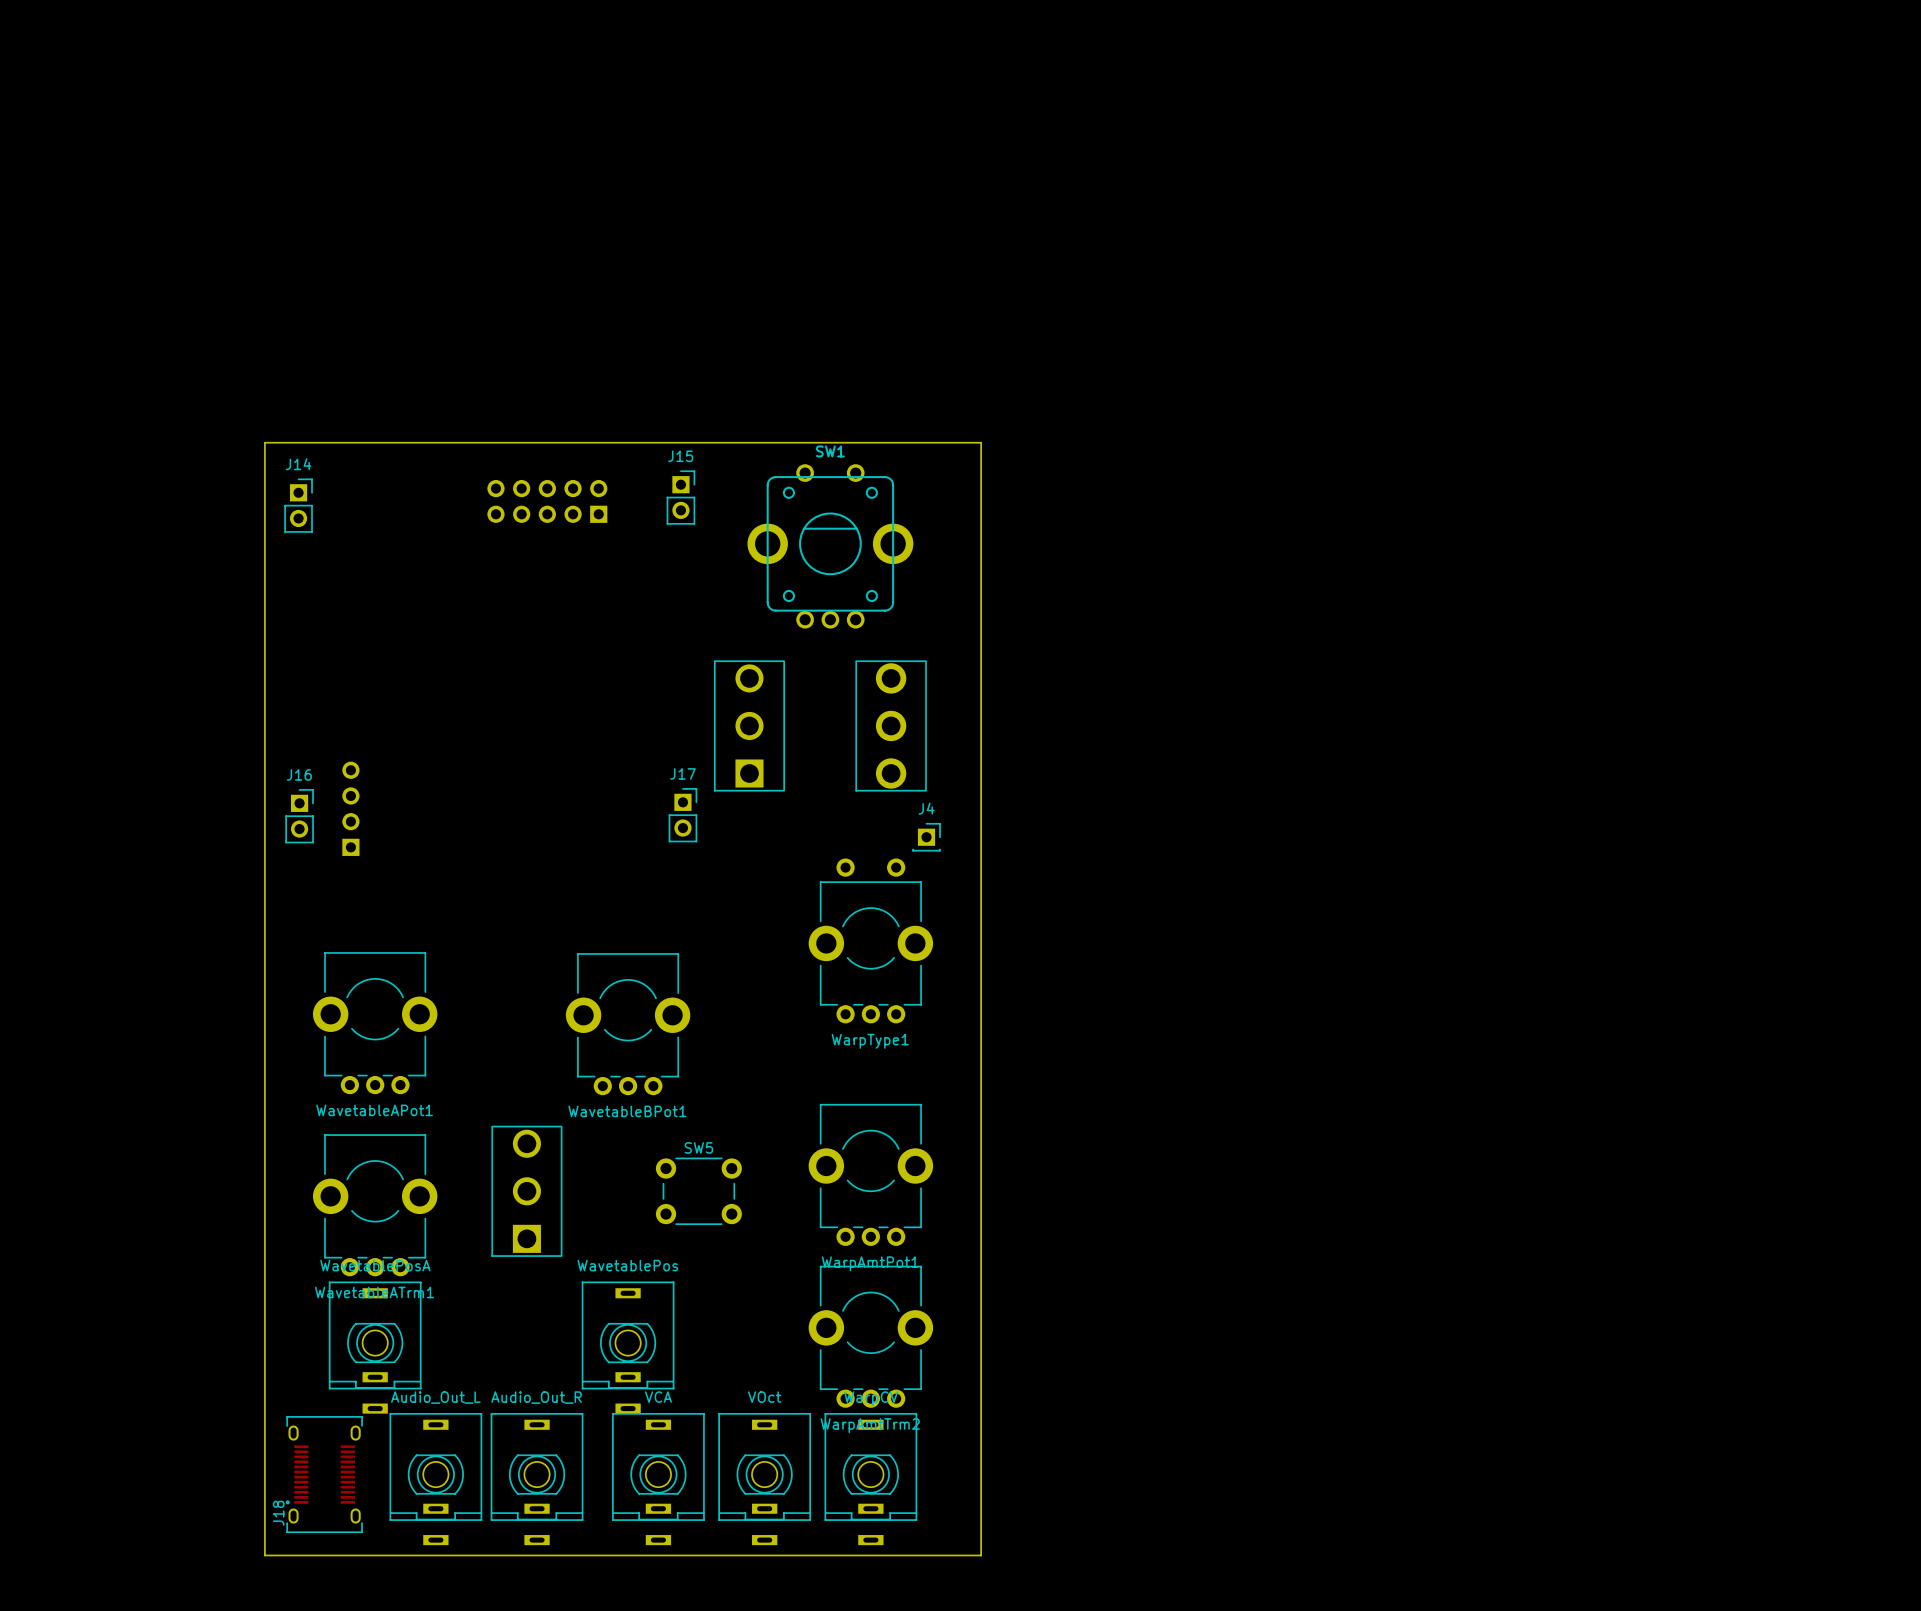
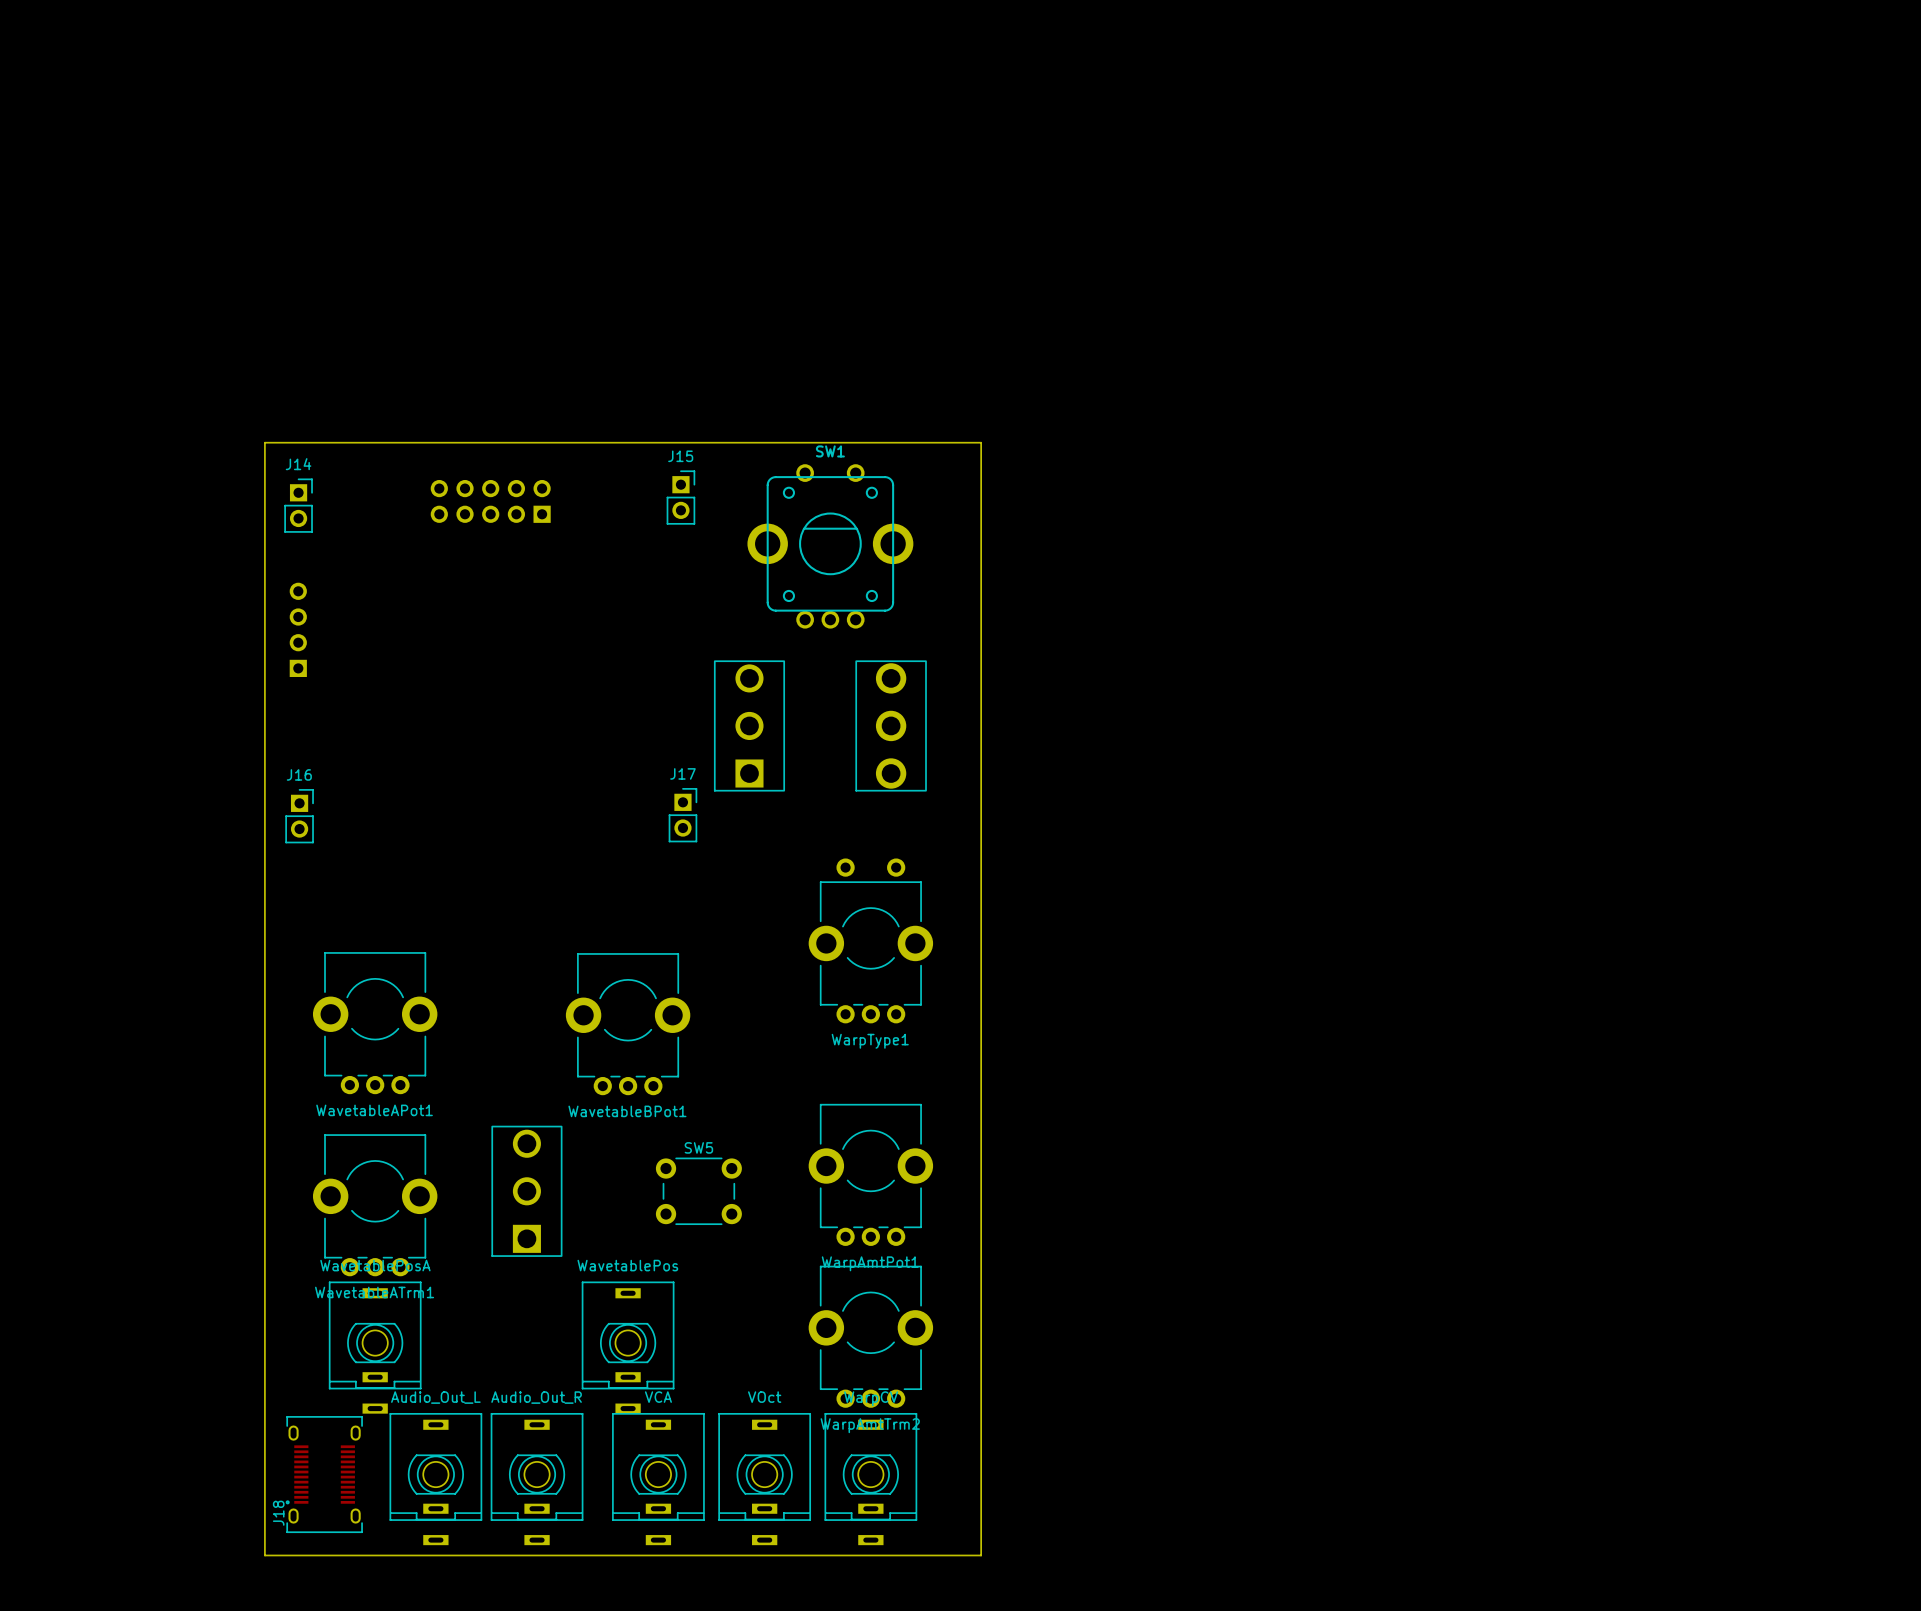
part position: (547, 501) -> (490, 501)
part position: (350, 808) -> (298, 629)
J4: (926, 837) -> none

